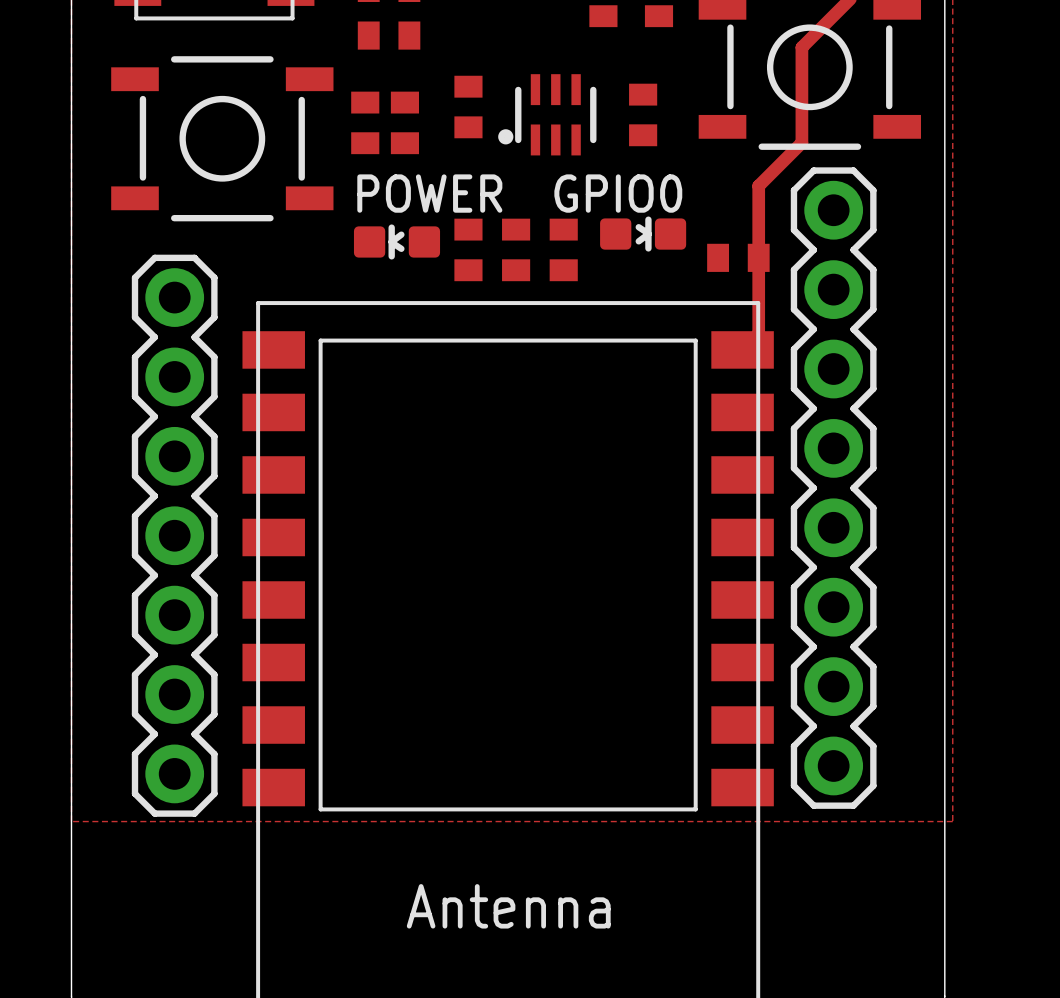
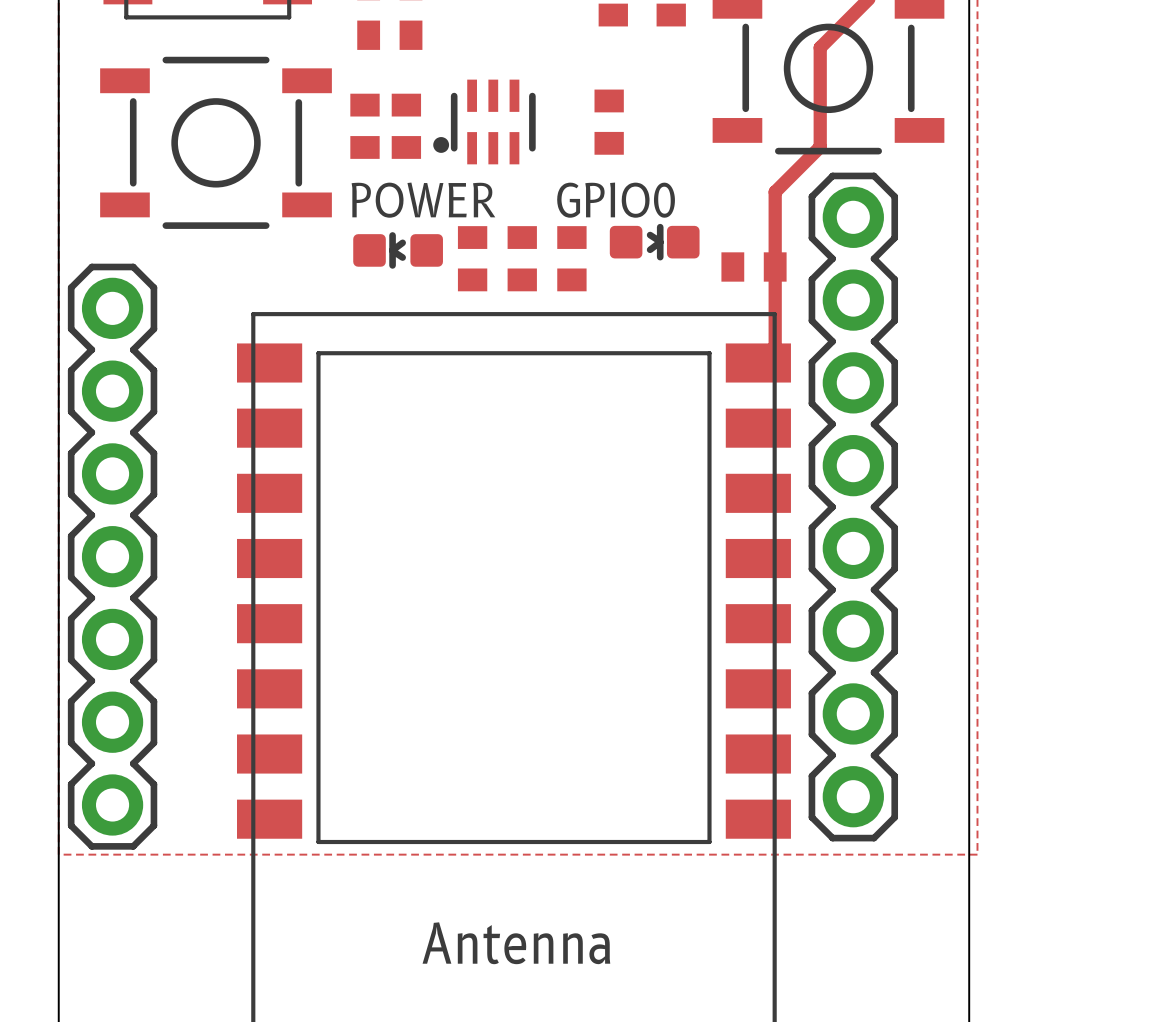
part footprint: [454, 75, 483, 139] -> [433, 79, 536, 165]
part: (547, 114) -> none
part position: (643, 114) -> (609, 122)
part position: (174, 535) -> (112, 556)

